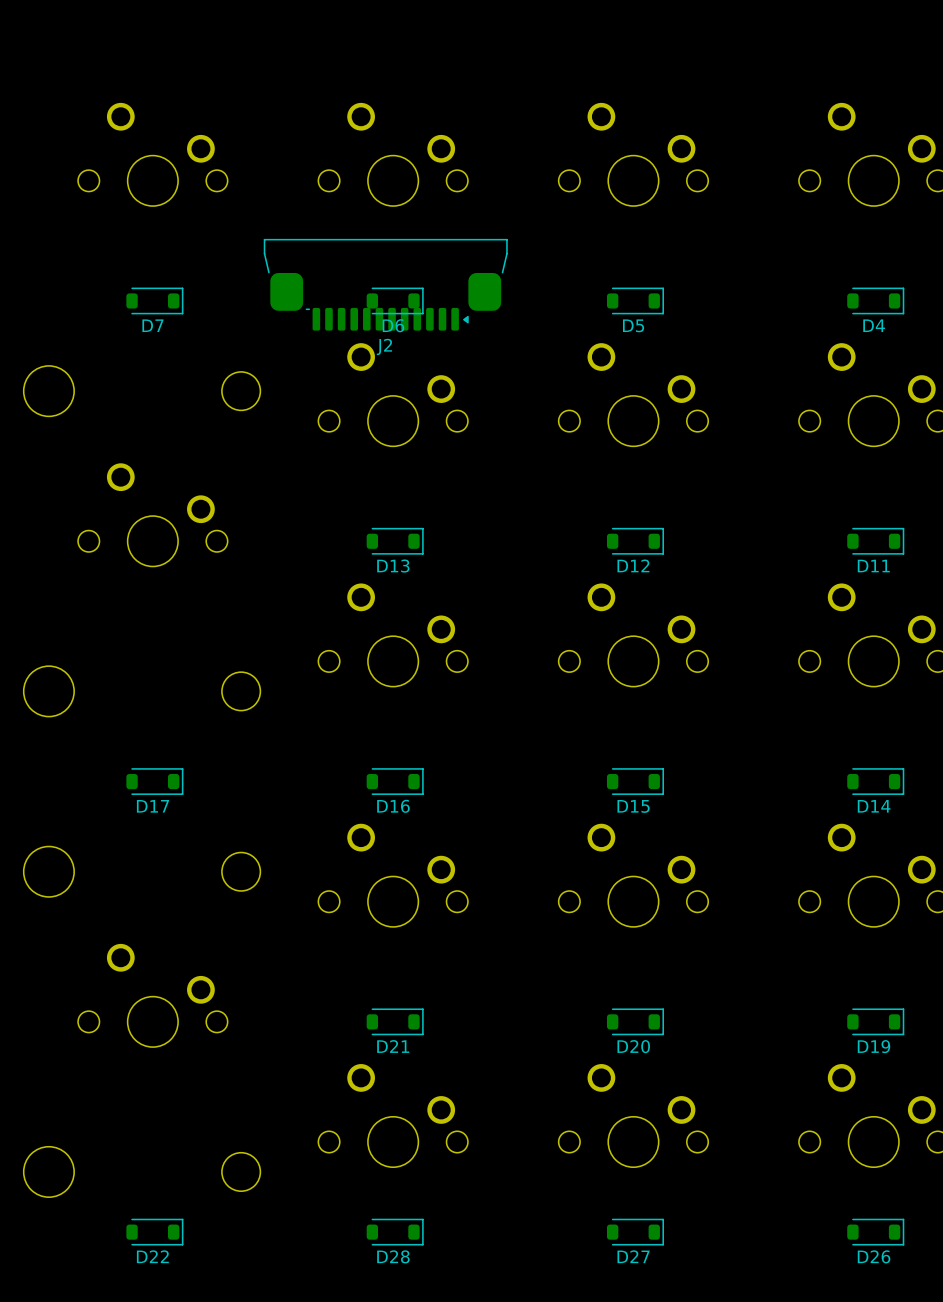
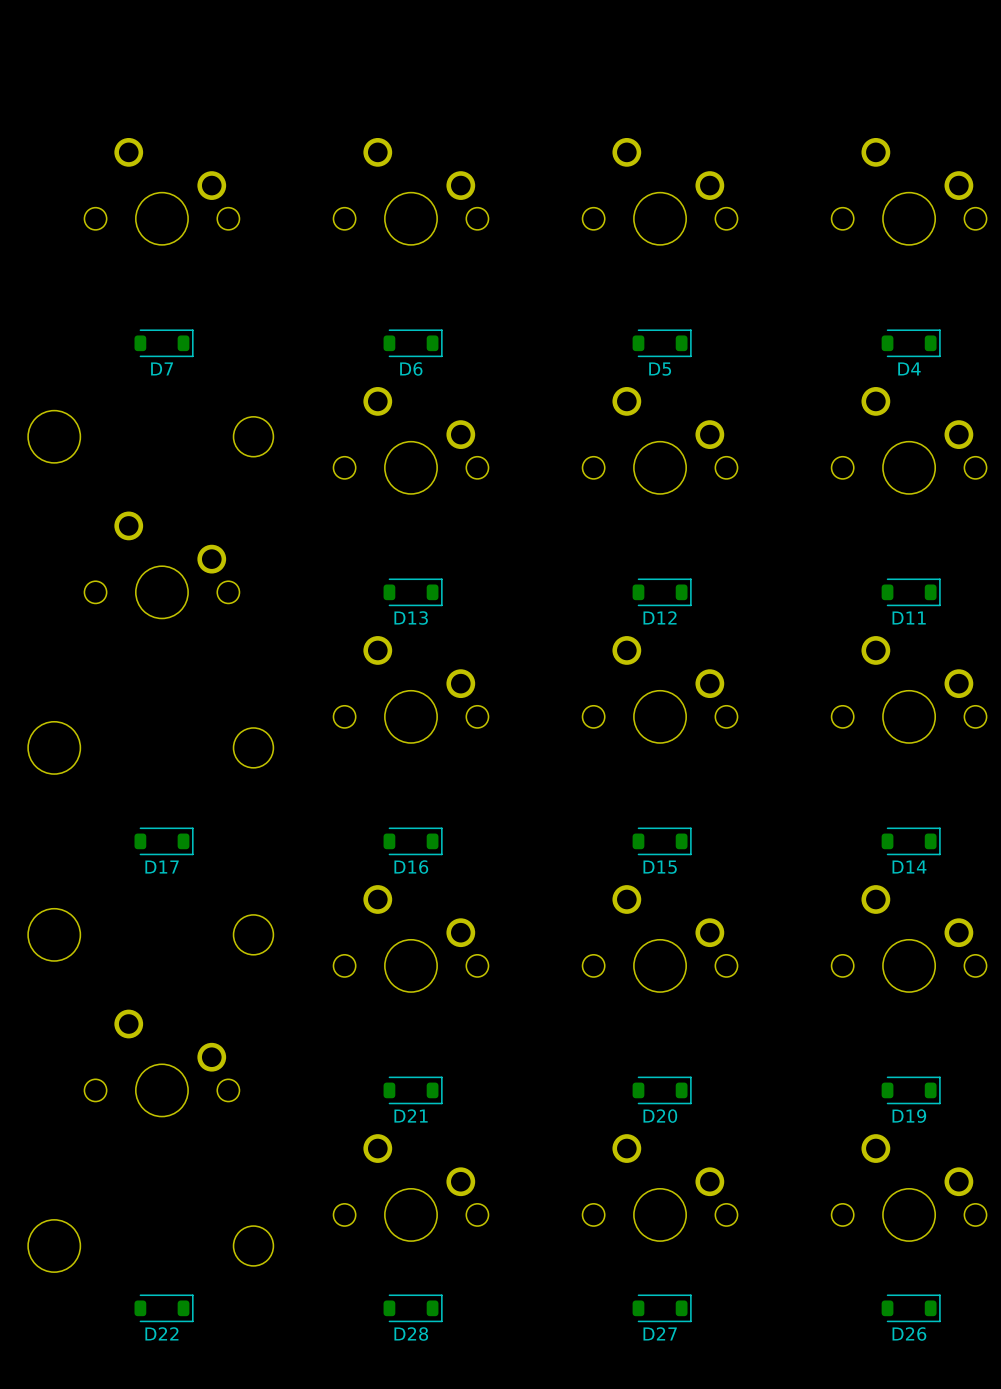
J2: (385, 284) -> none

